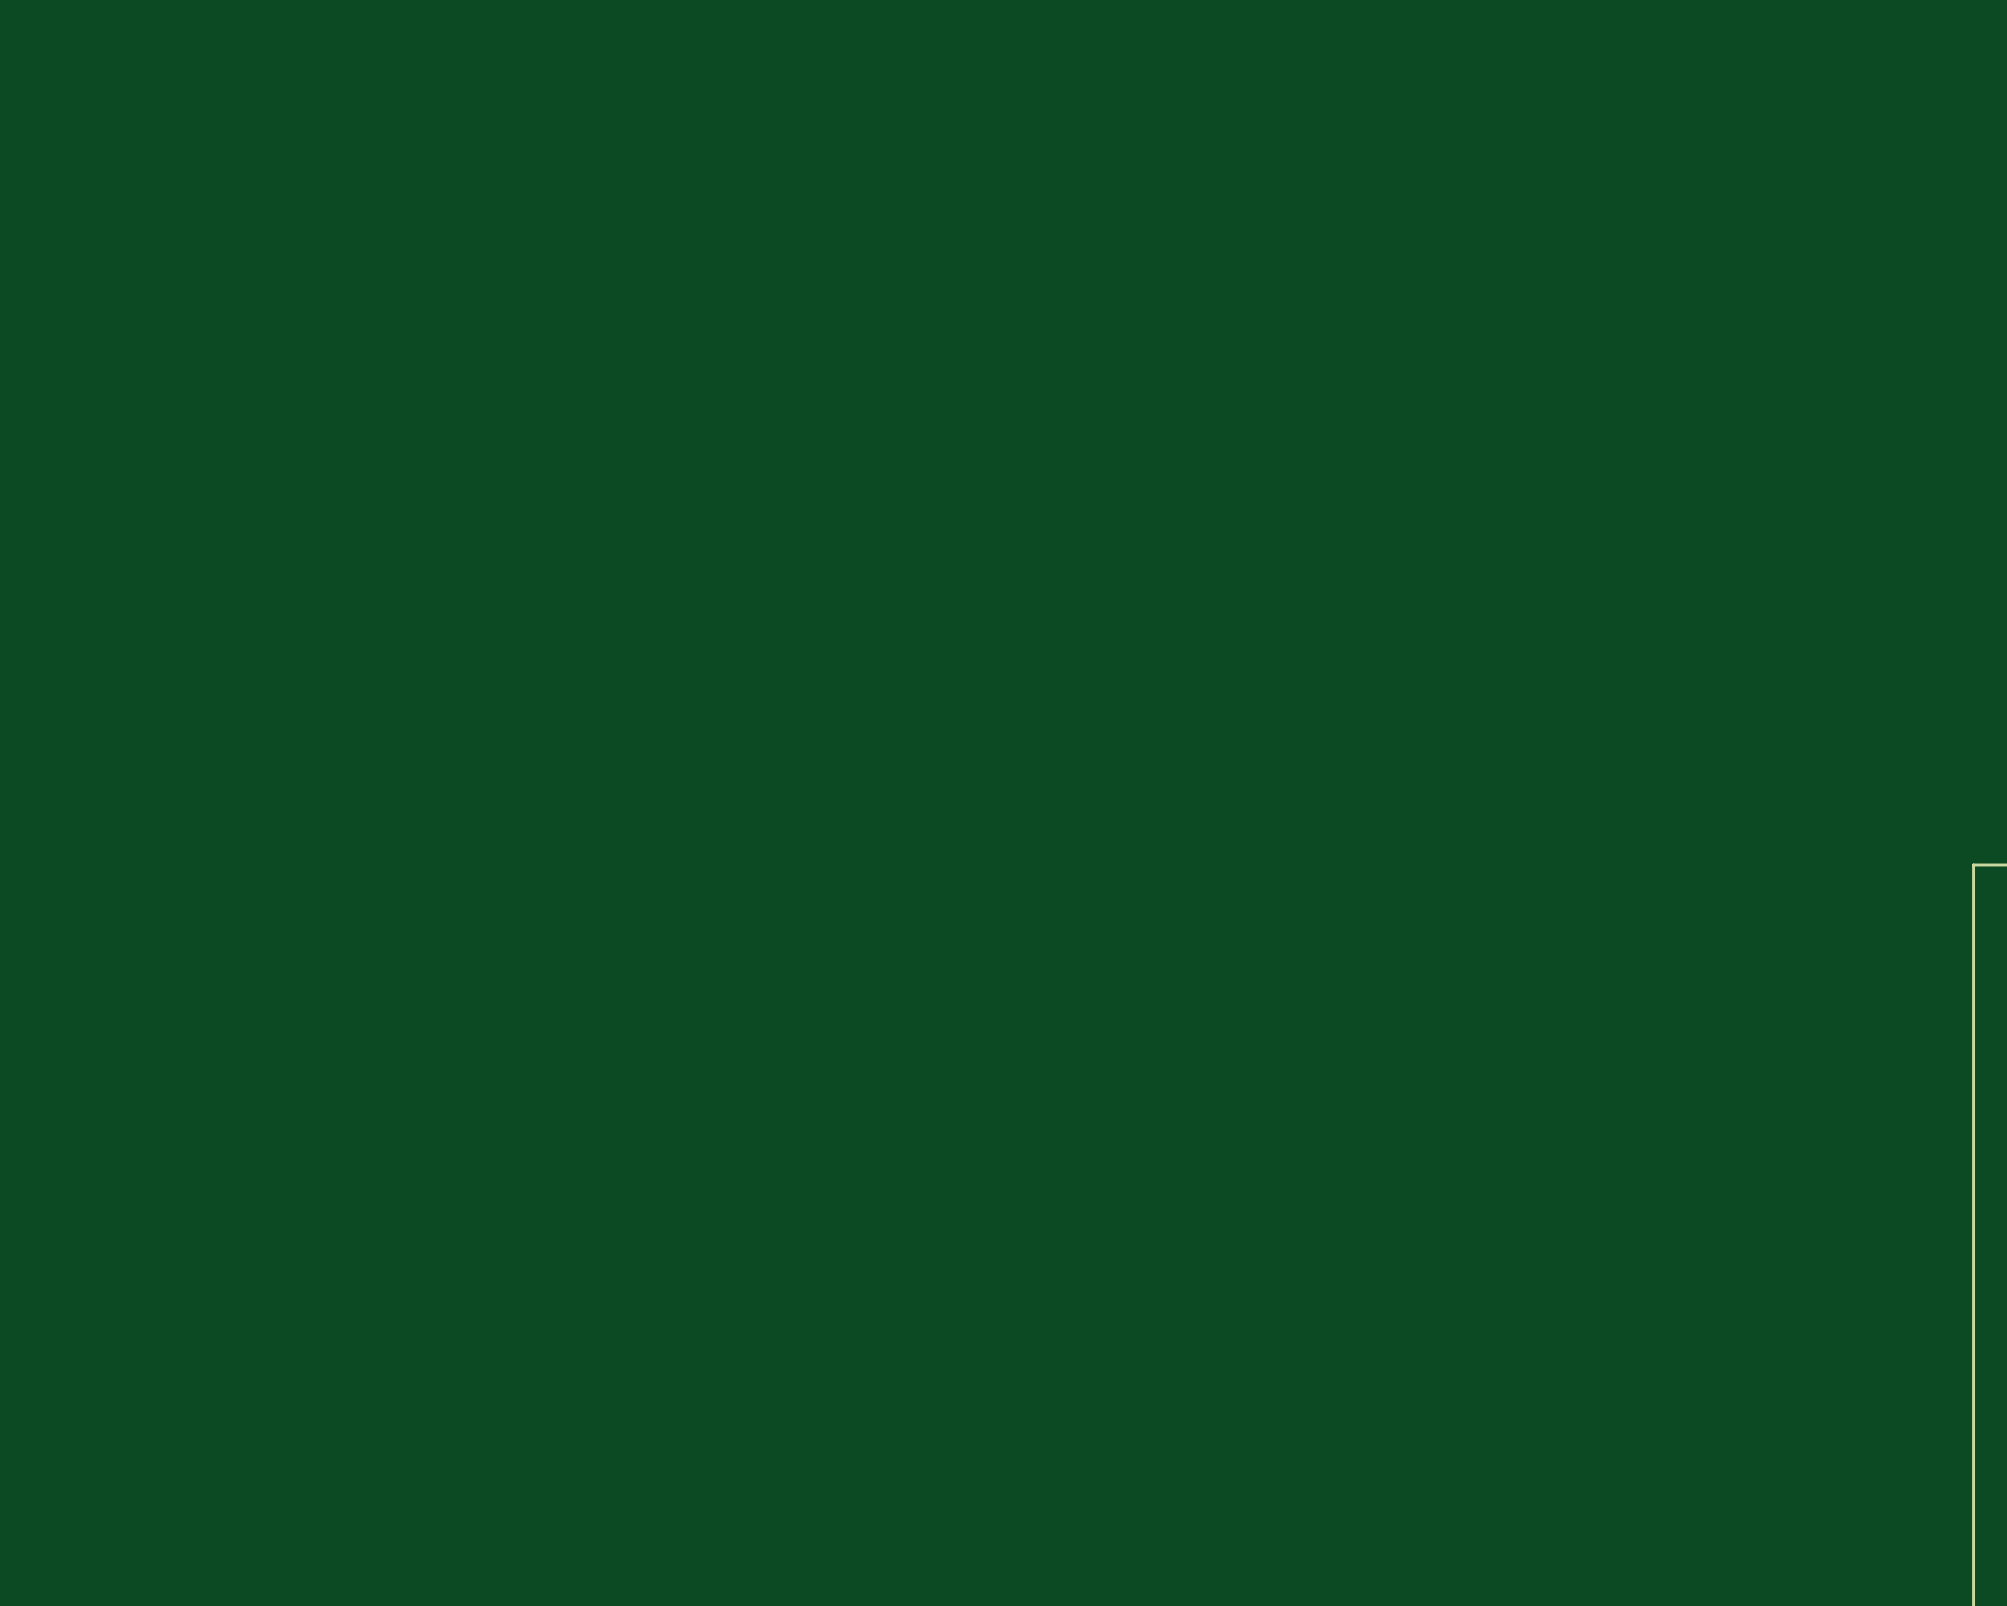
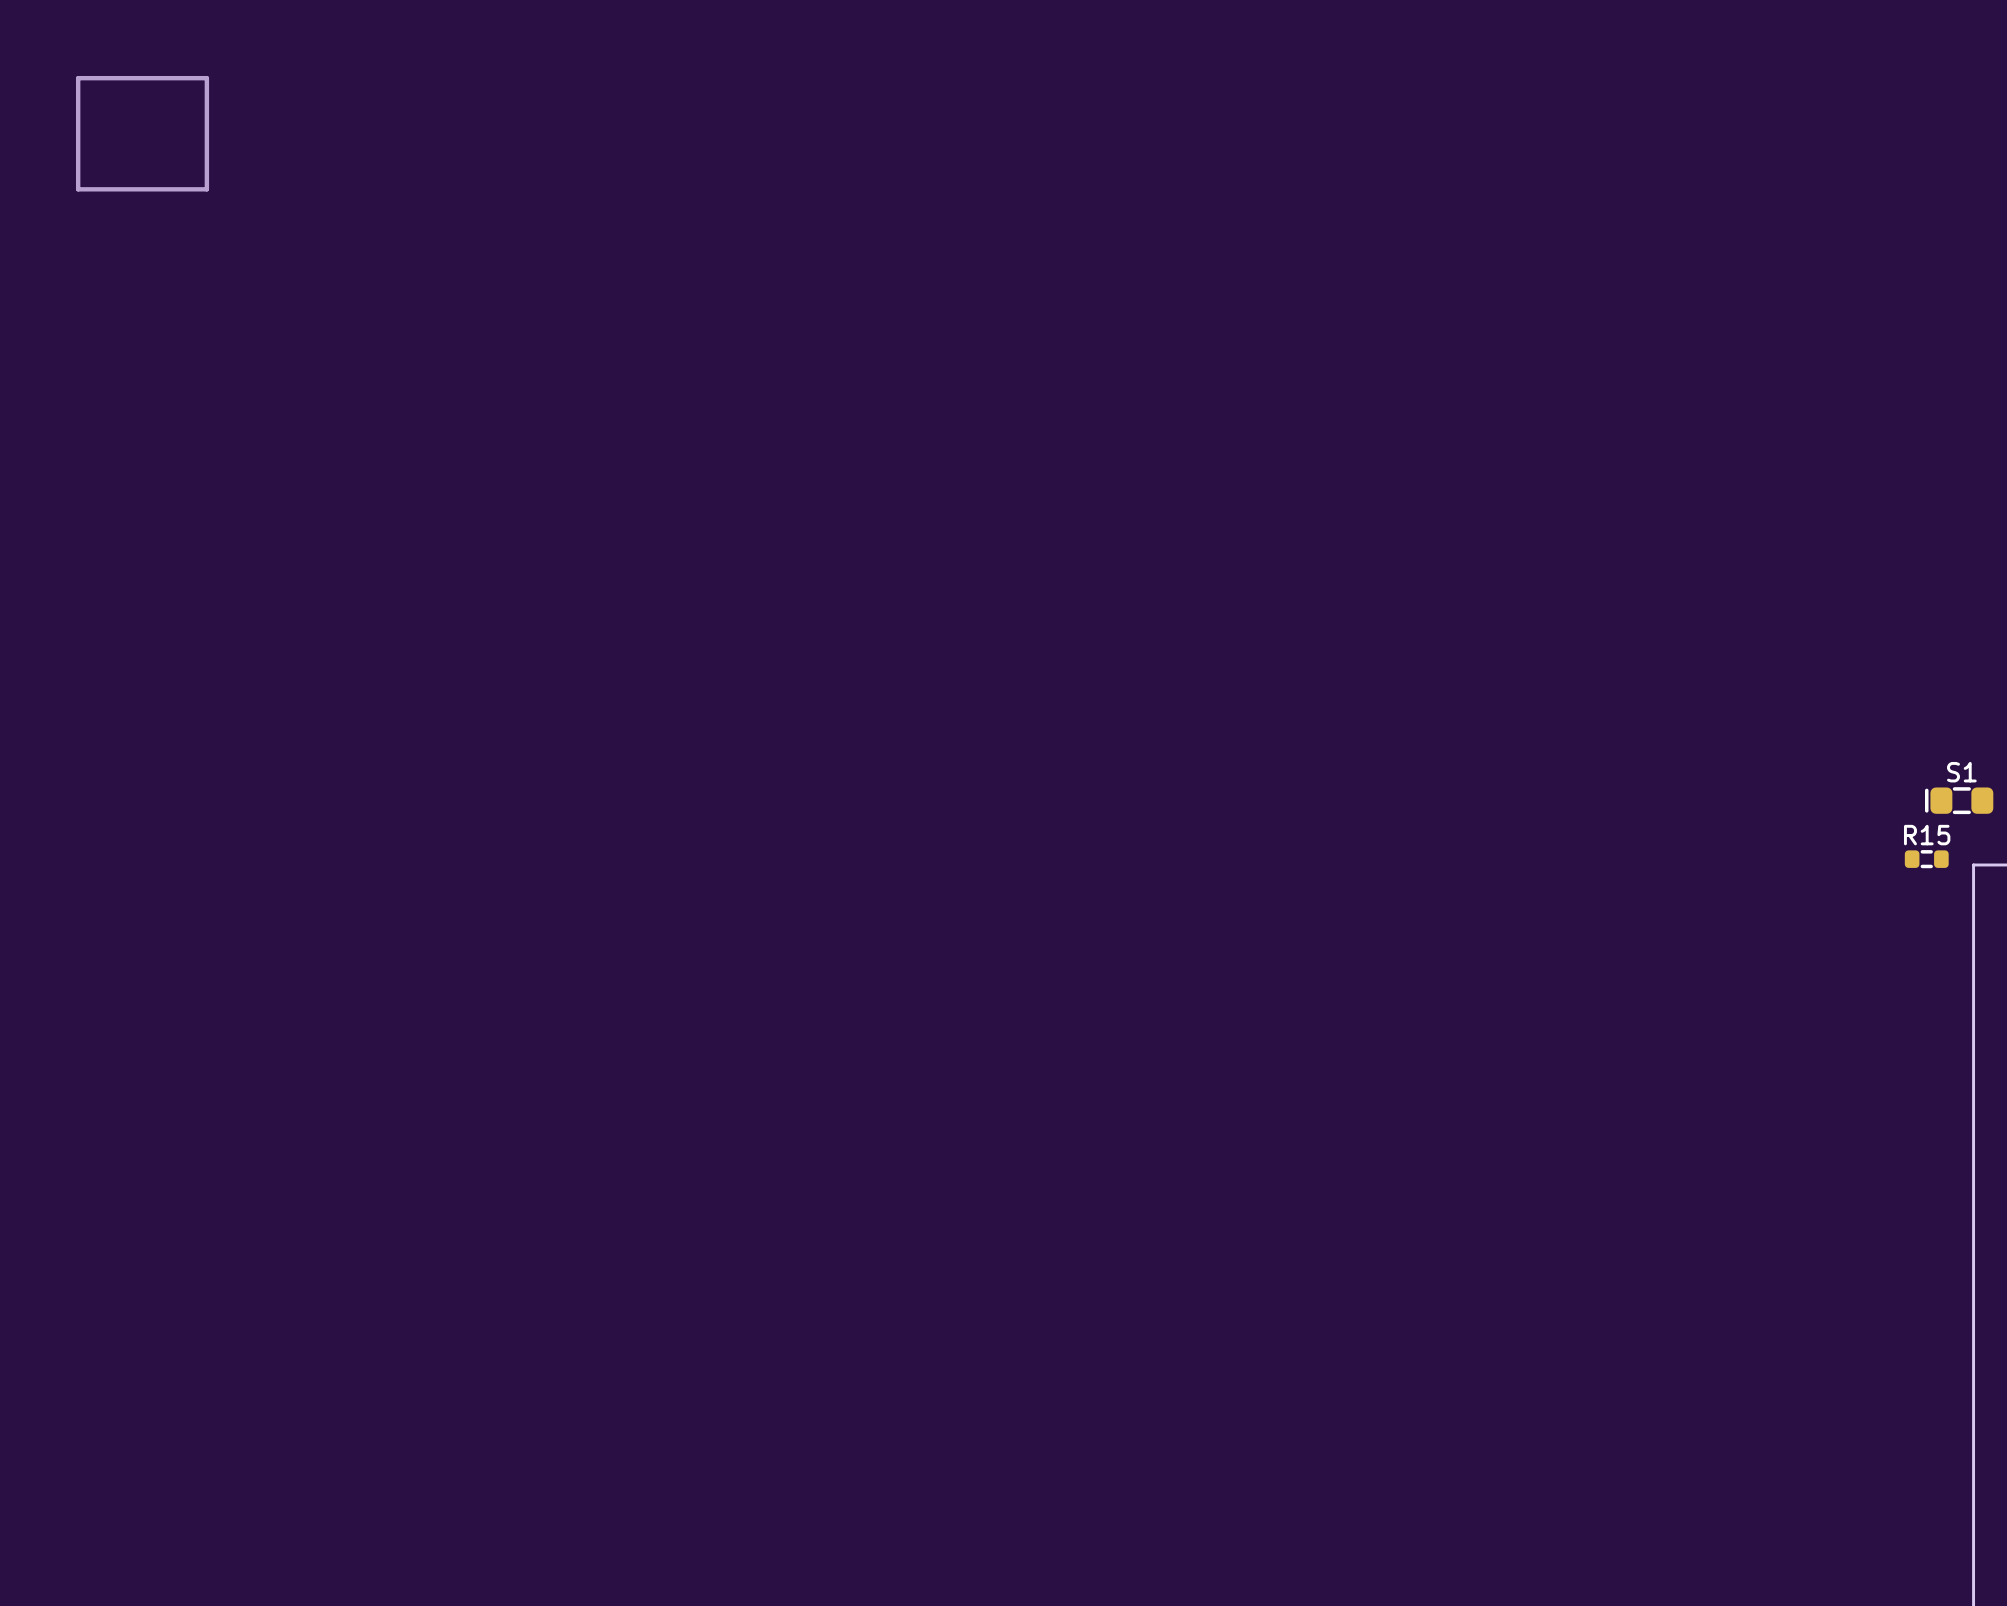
line: none -> (78, 78) (78, 189) (206, 189) (206, 78) (78, 78)
S1: none -> (1959, 800)
R15: none -> (1926, 859)

